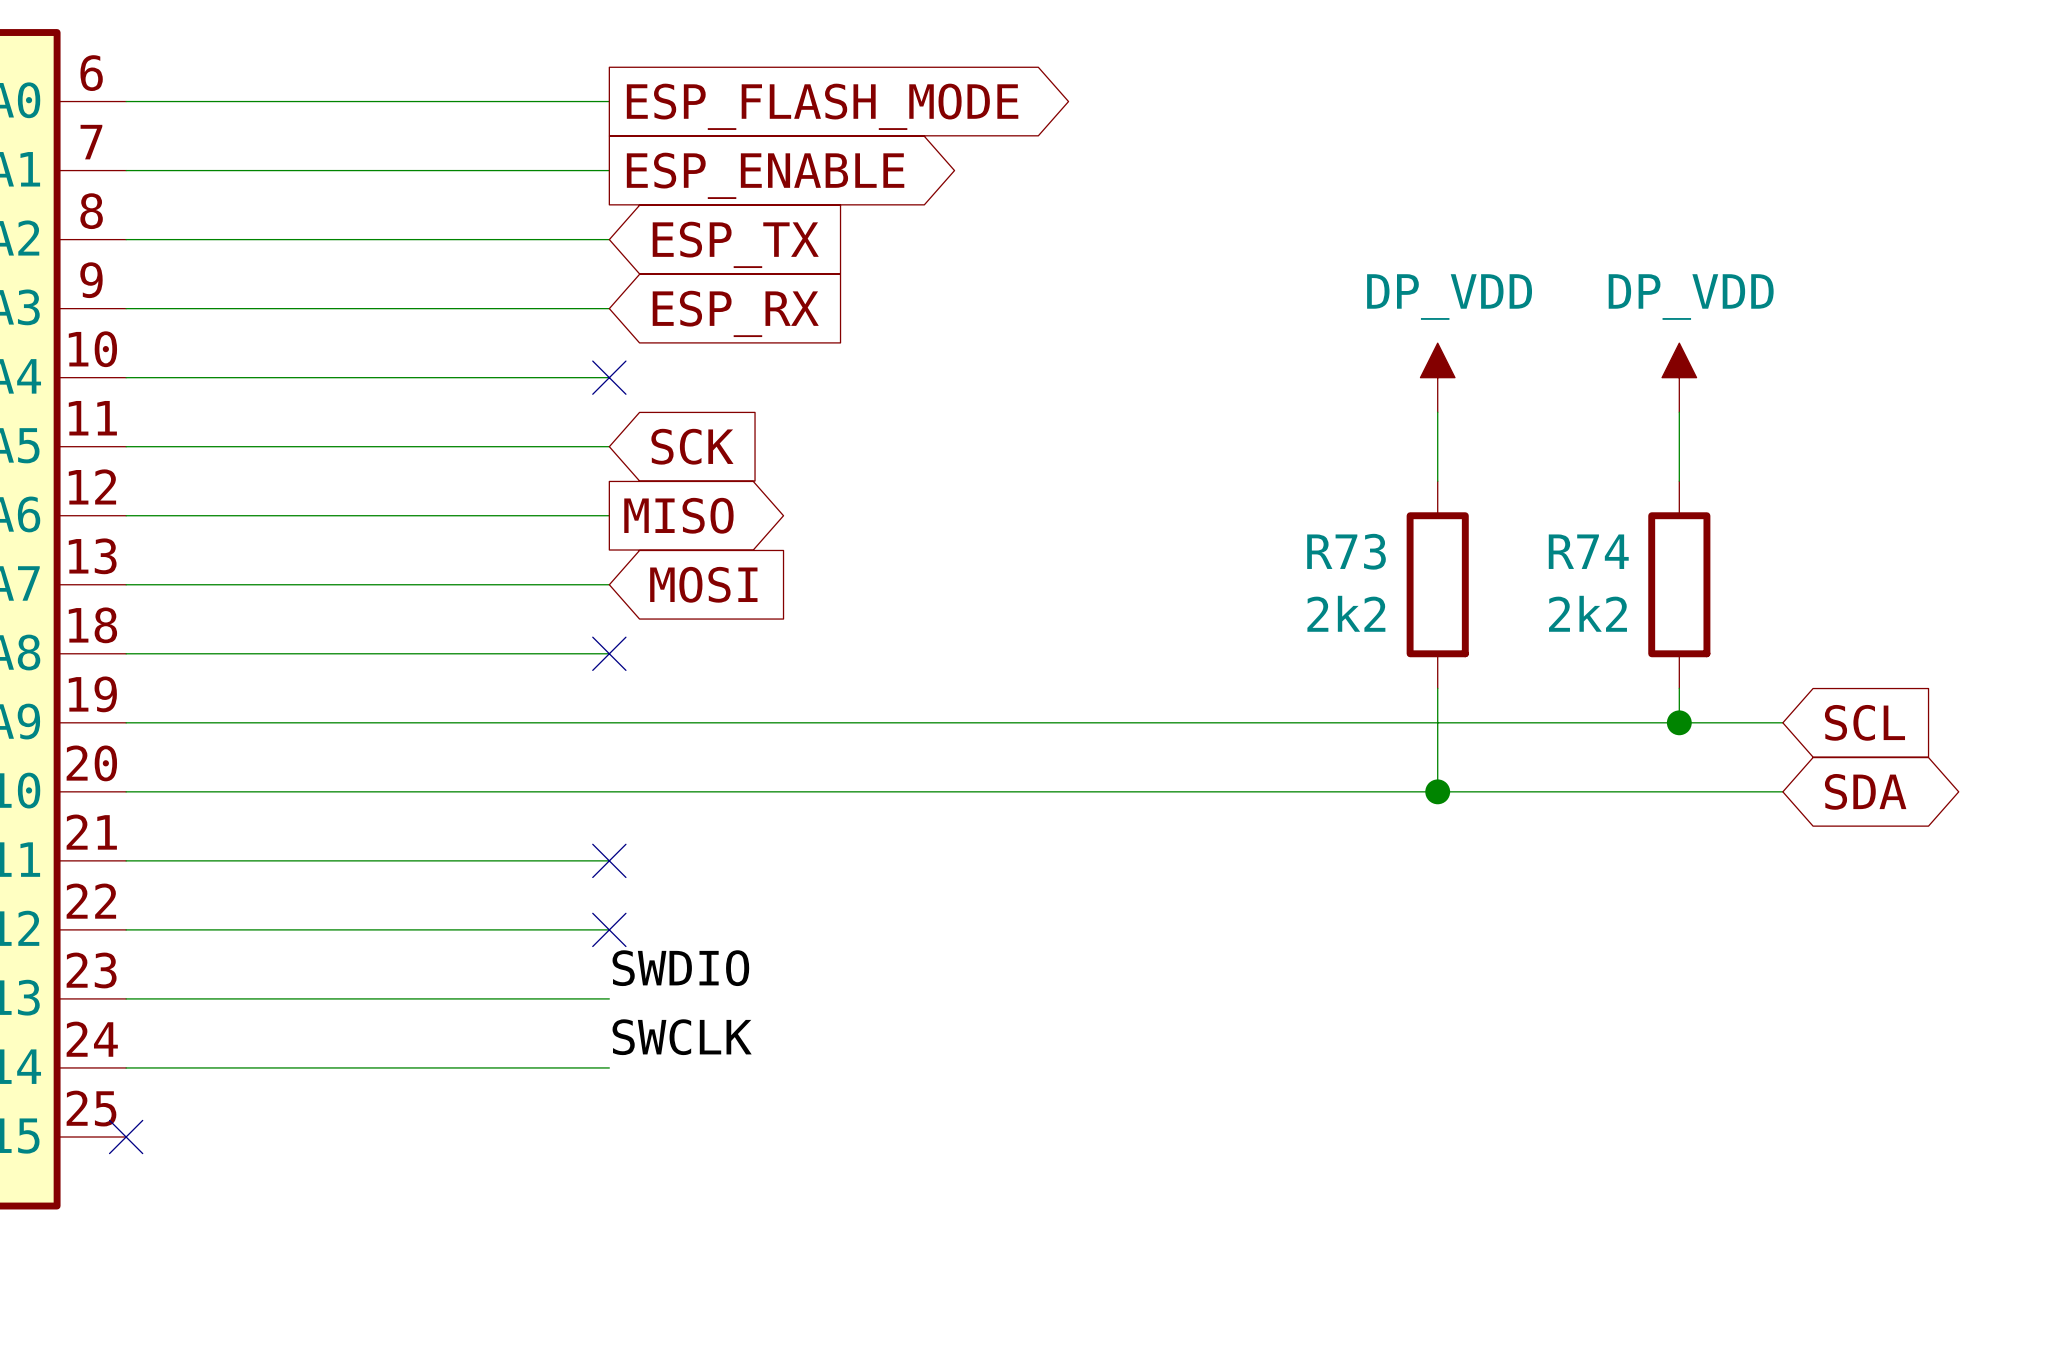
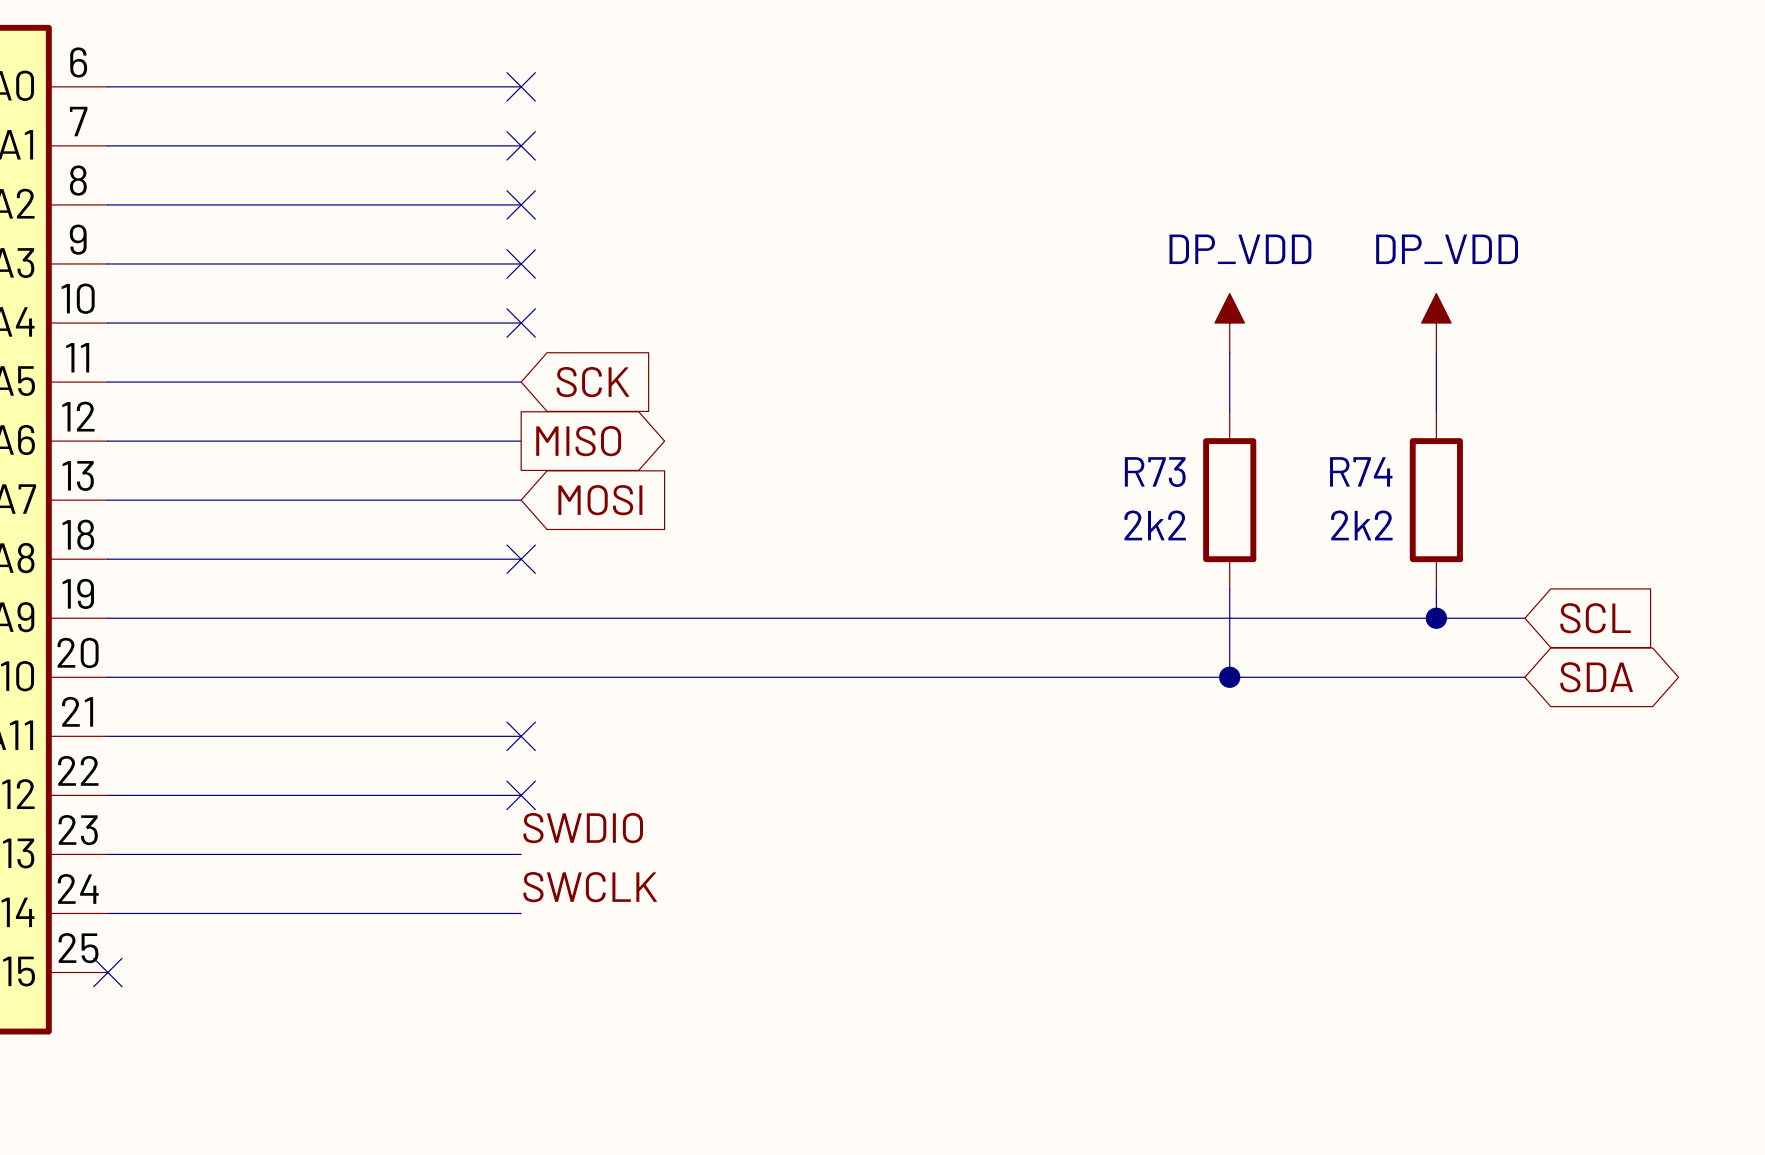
no-connect mark: none -> (521, 86)
global label: ESP_FLASH_MODE (822, 106) -> none
no-connect mark: none -> (521, 145)
global label: ESP_ENABLE (765, 175) -> none
no-connect mark: none -> (521, 204)
global label: ESP_TX (735, 244) -> none
no-connect mark: none -> (521, 263)
global label: ESP_RX (735, 313) -> none

